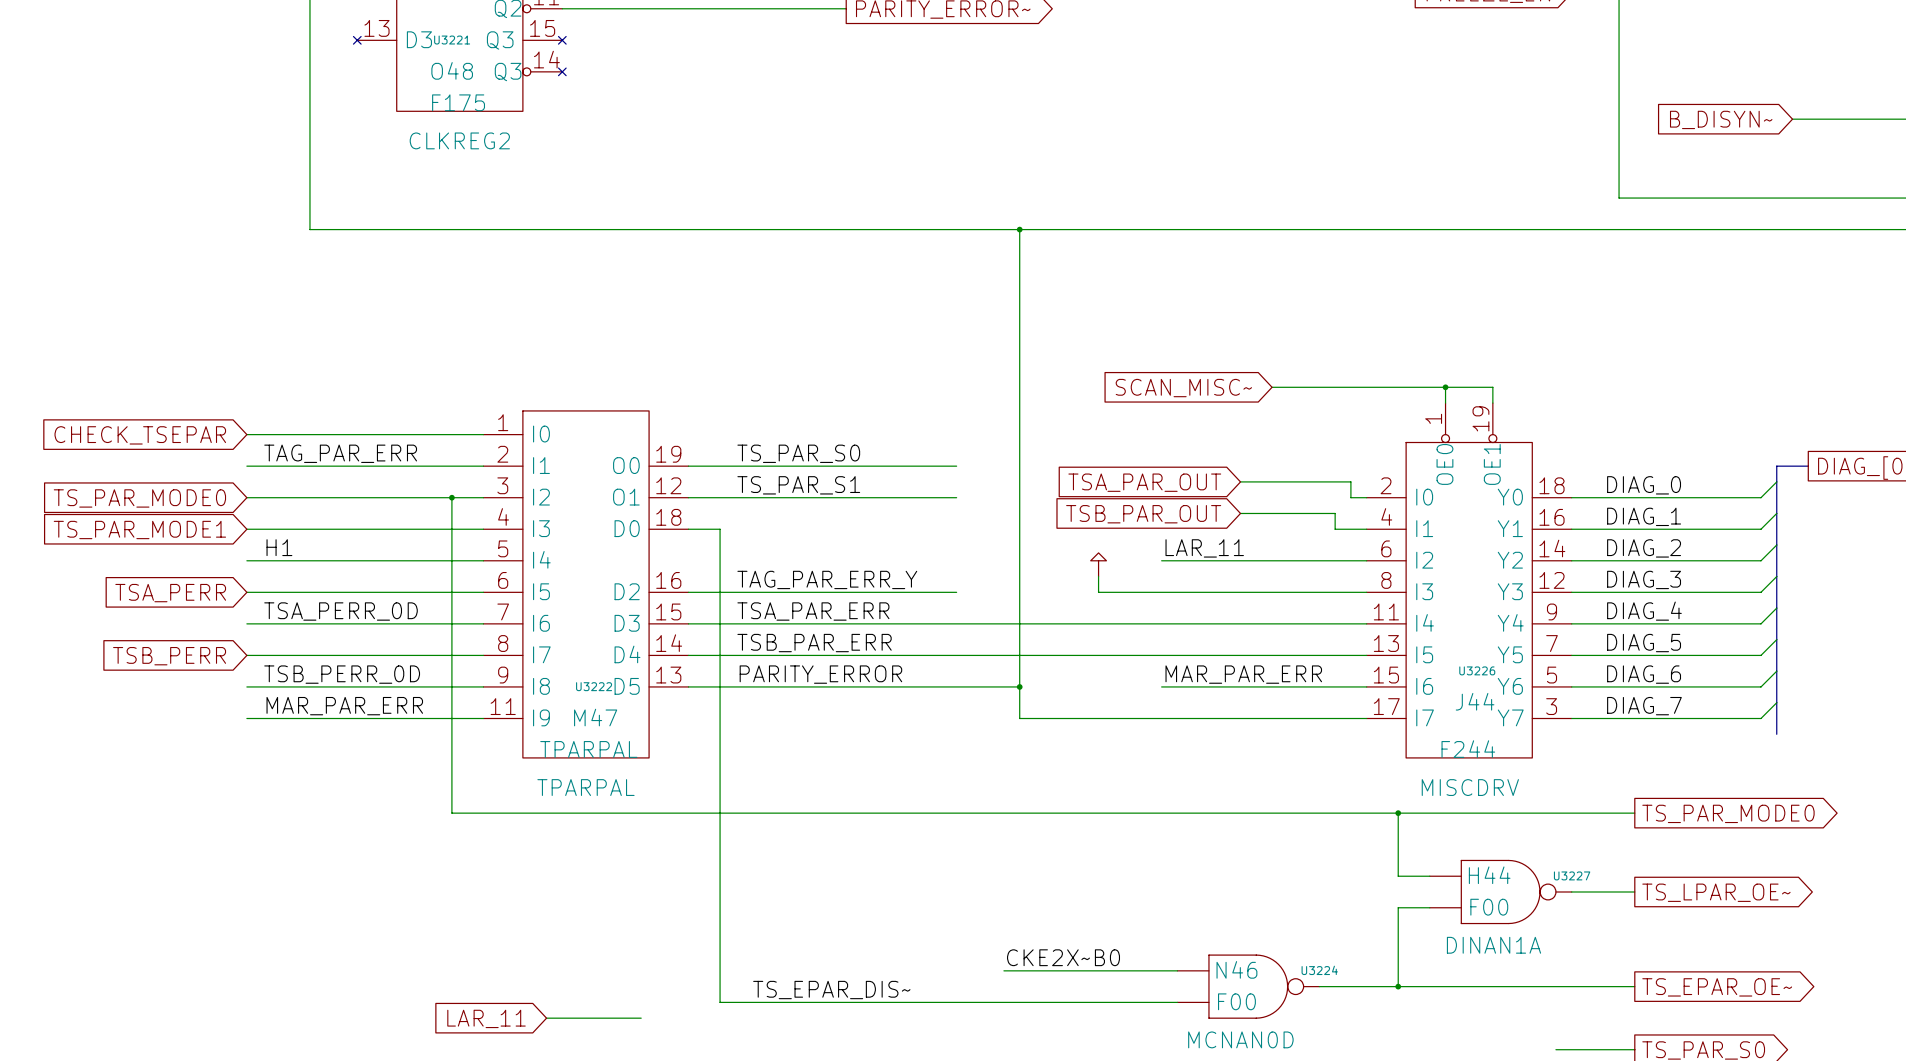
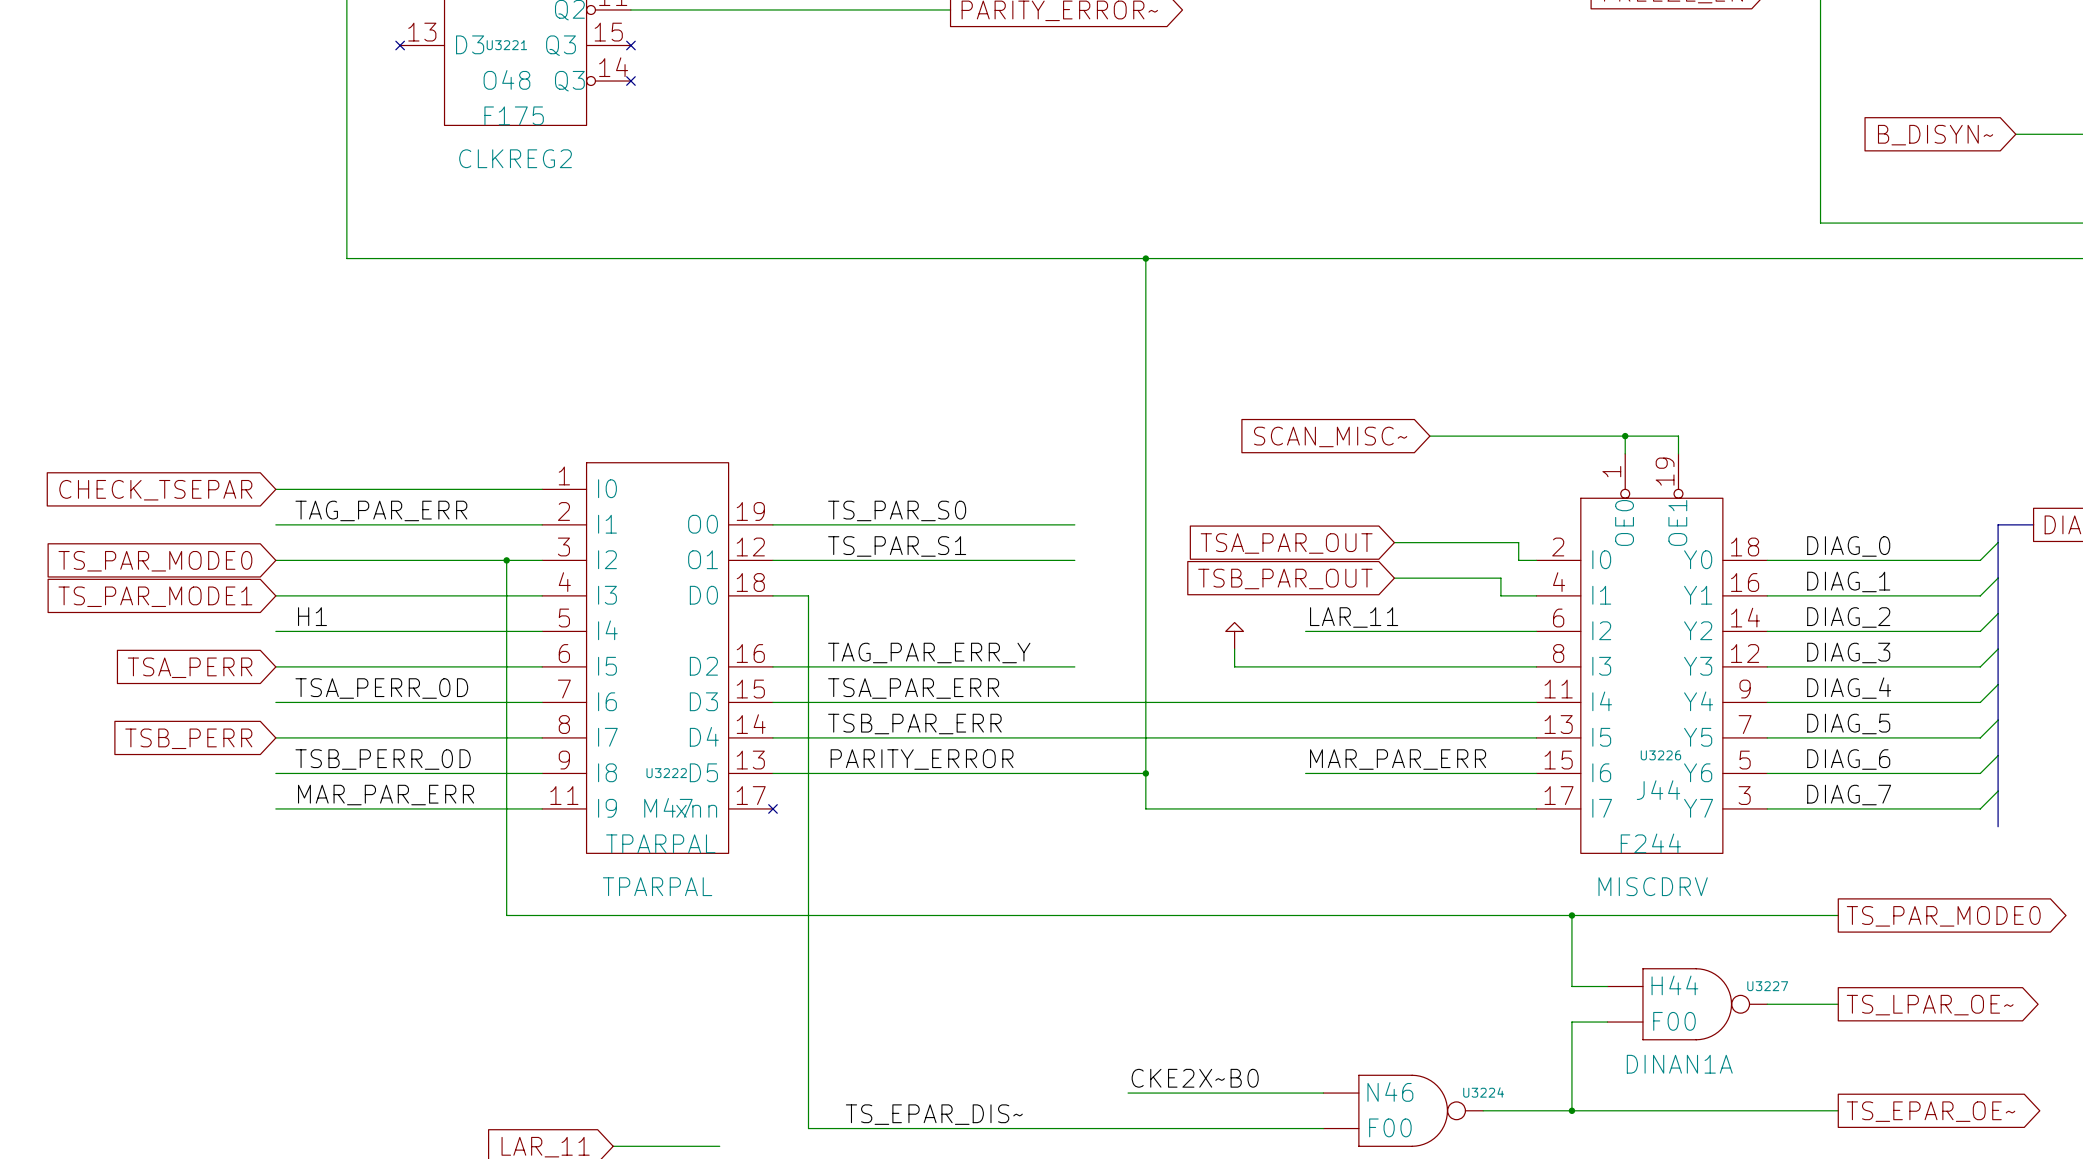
U3222 symbol: [483, 410, 689, 758] -> [542, 462, 773, 854]
no-connect mark: none -> (772, 808)

